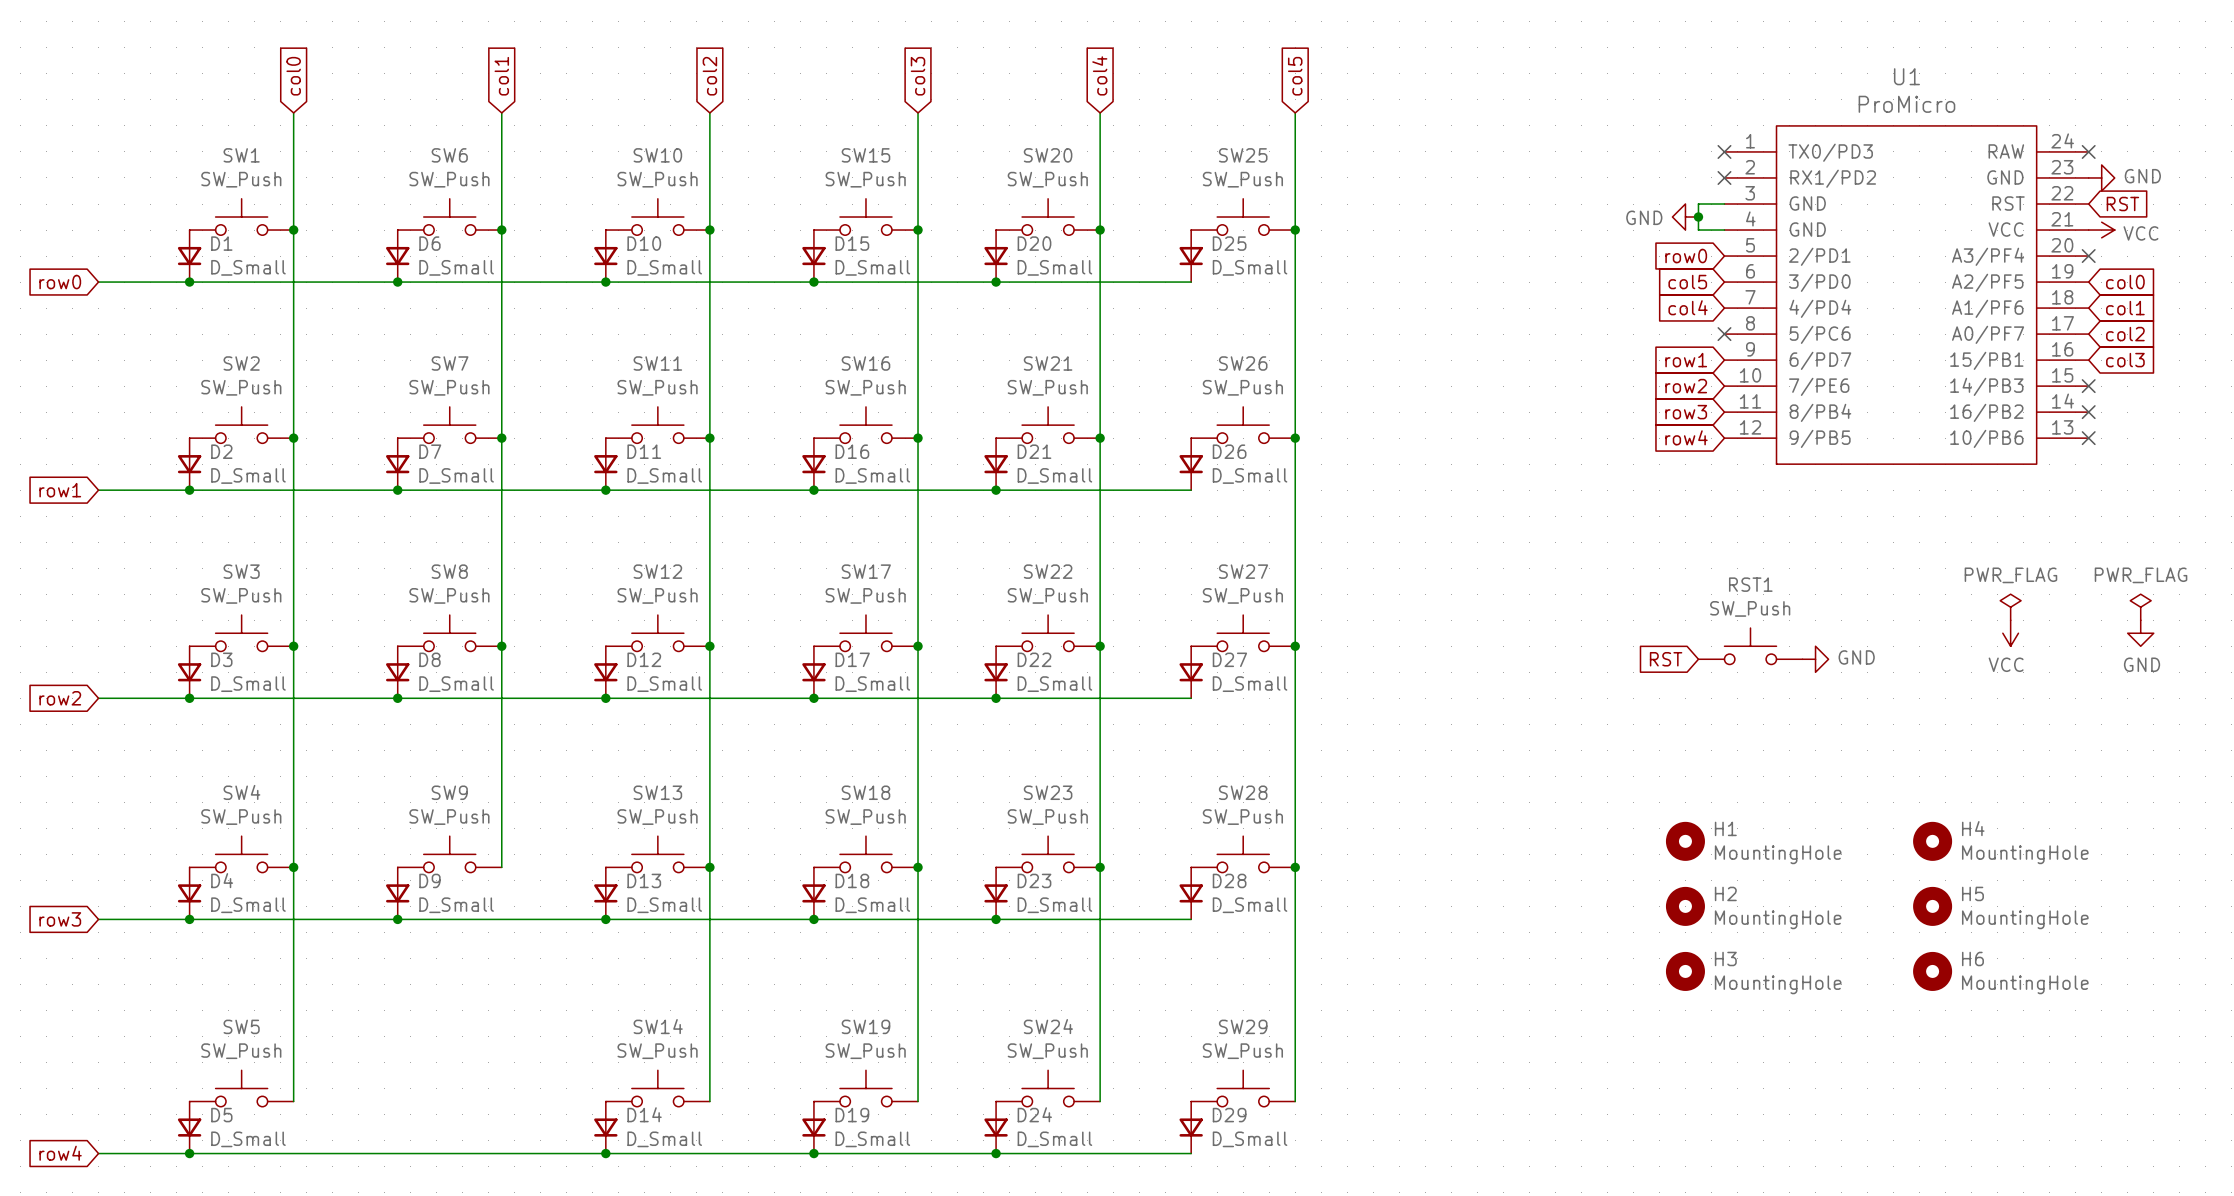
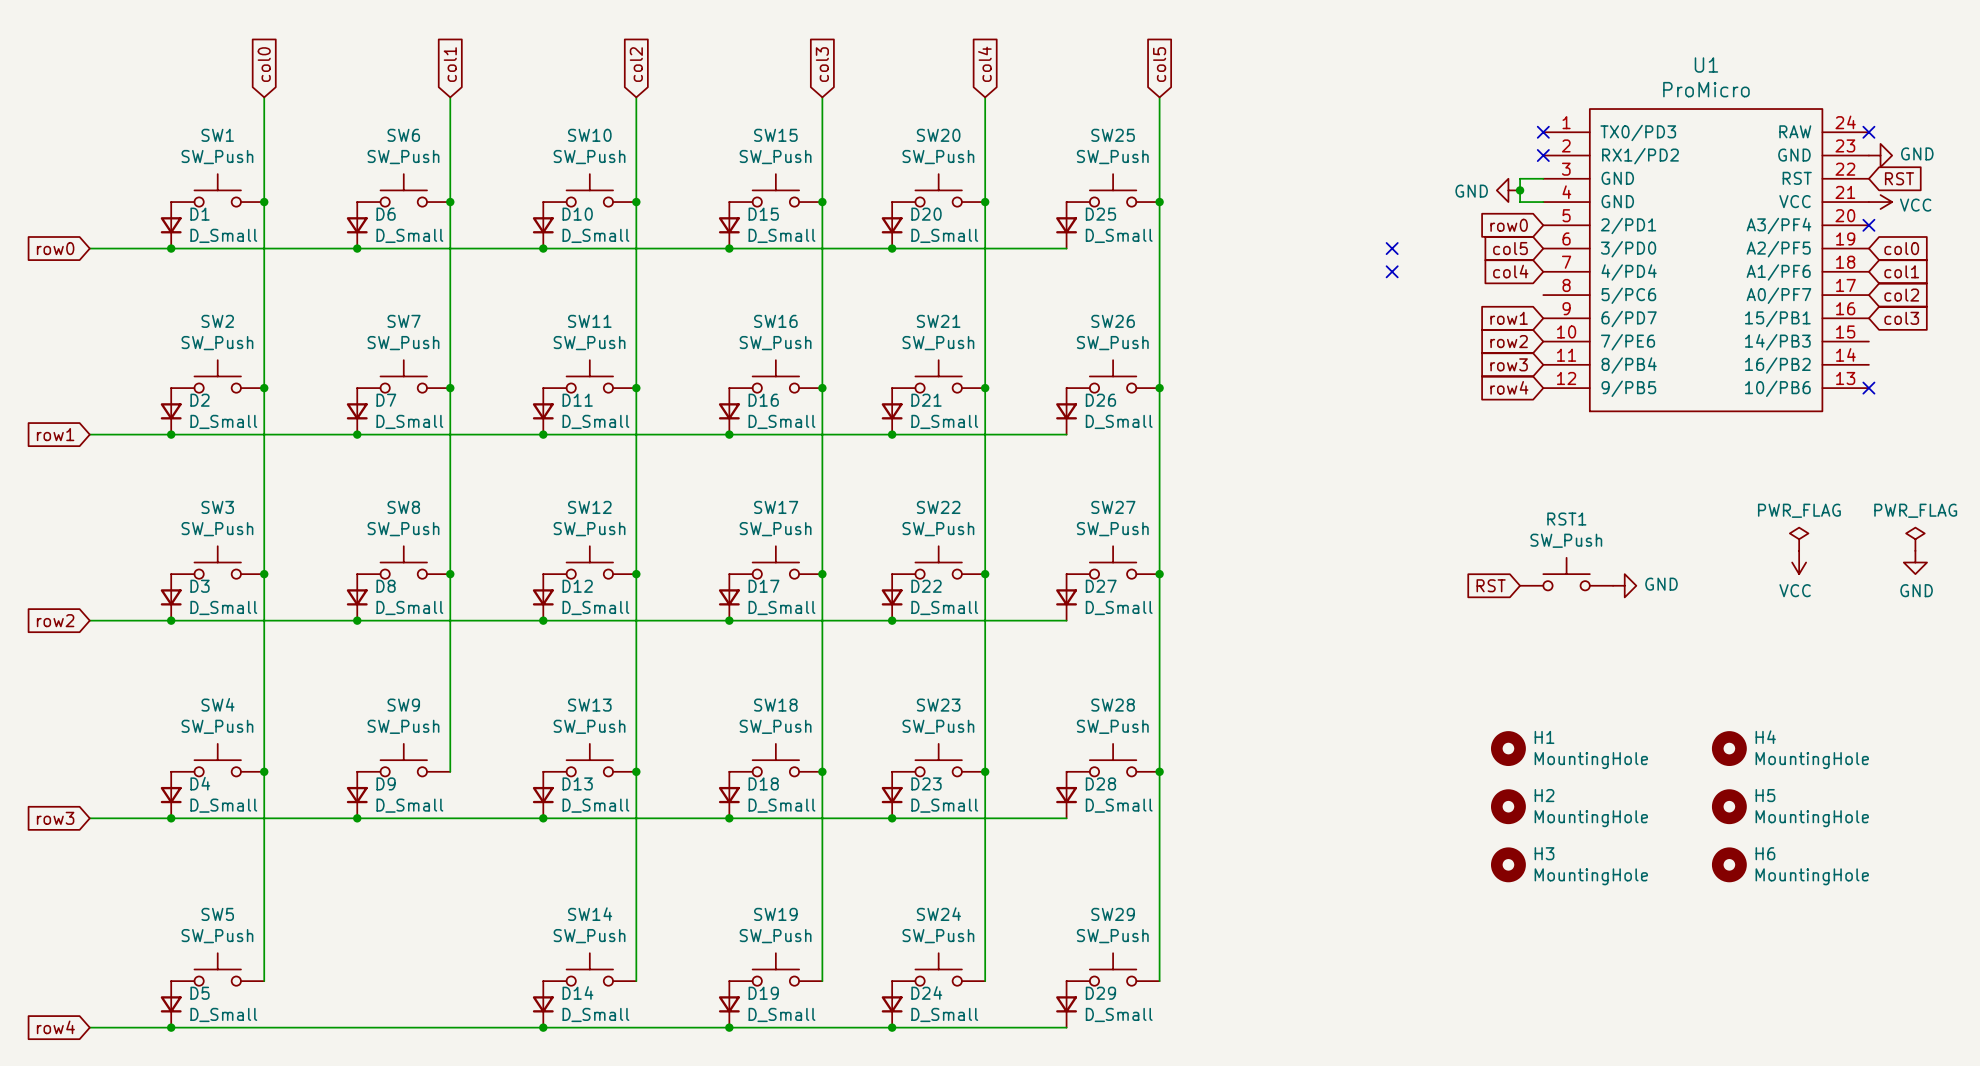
no-connect mark: none -> (1392, 248)
no-connect mark: none -> (1392, 271)
no-connect mark: (1724, 334) -> none
no-connect mark: (2088, 386) -> none
no-connect mark: (2088, 412) -> none

